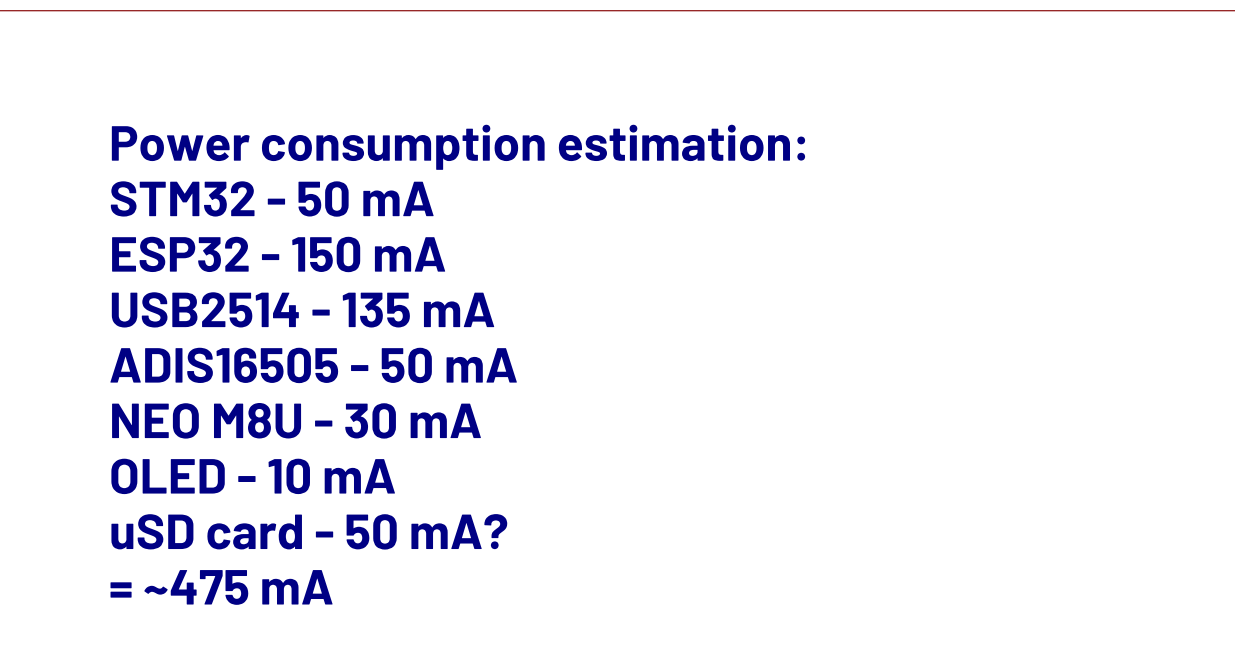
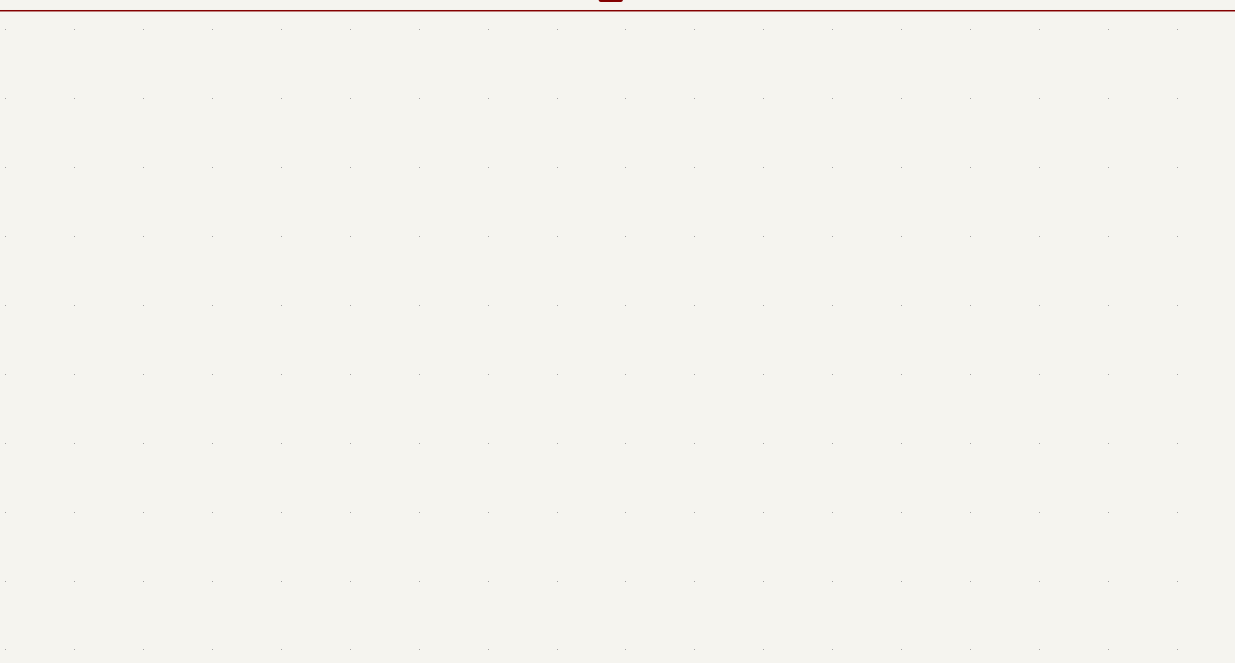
text: Power consumption estimation: (458, 147) -> none
text: STM32 - 50 mA (272, 199) -> none
text: ESP32 - 150 mA (278, 254) -> none
text: USB2514 - 135 mA (303, 309) -> none
text: ADIS16505 - 50 mA (313, 365) -> none
text: NEO M8U - 30 mA (296, 420) -> none
text: OLED - 10 mA (253, 476) -> none
text: uSD card - 50 mA? (309, 531) -> none
text: = ~475 mA (221, 587) -> none

